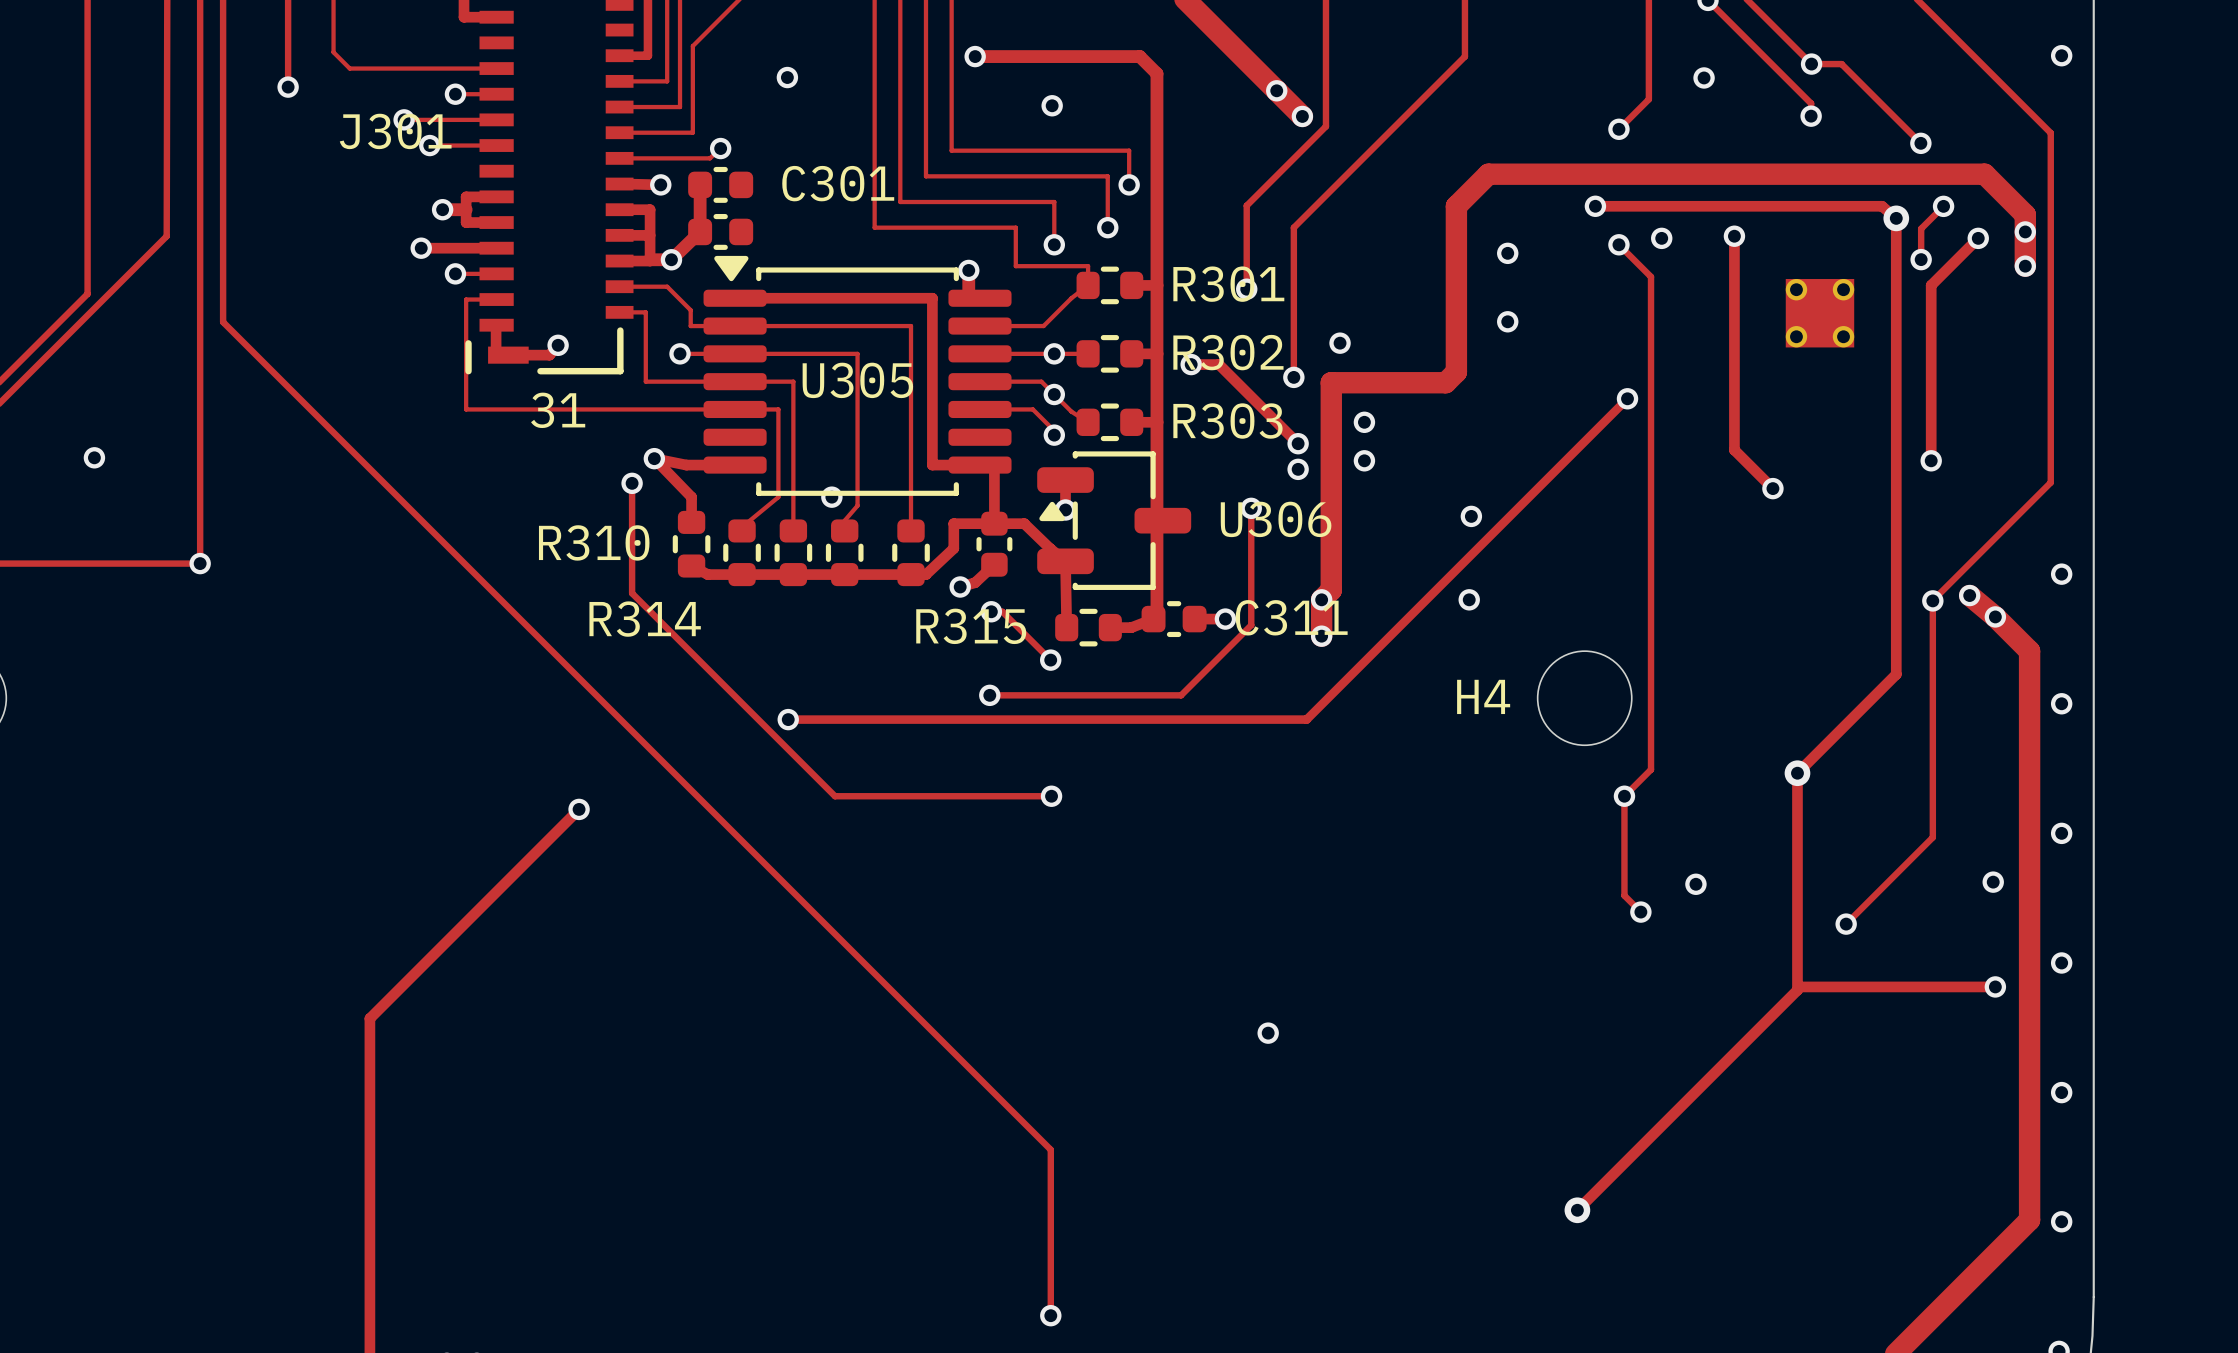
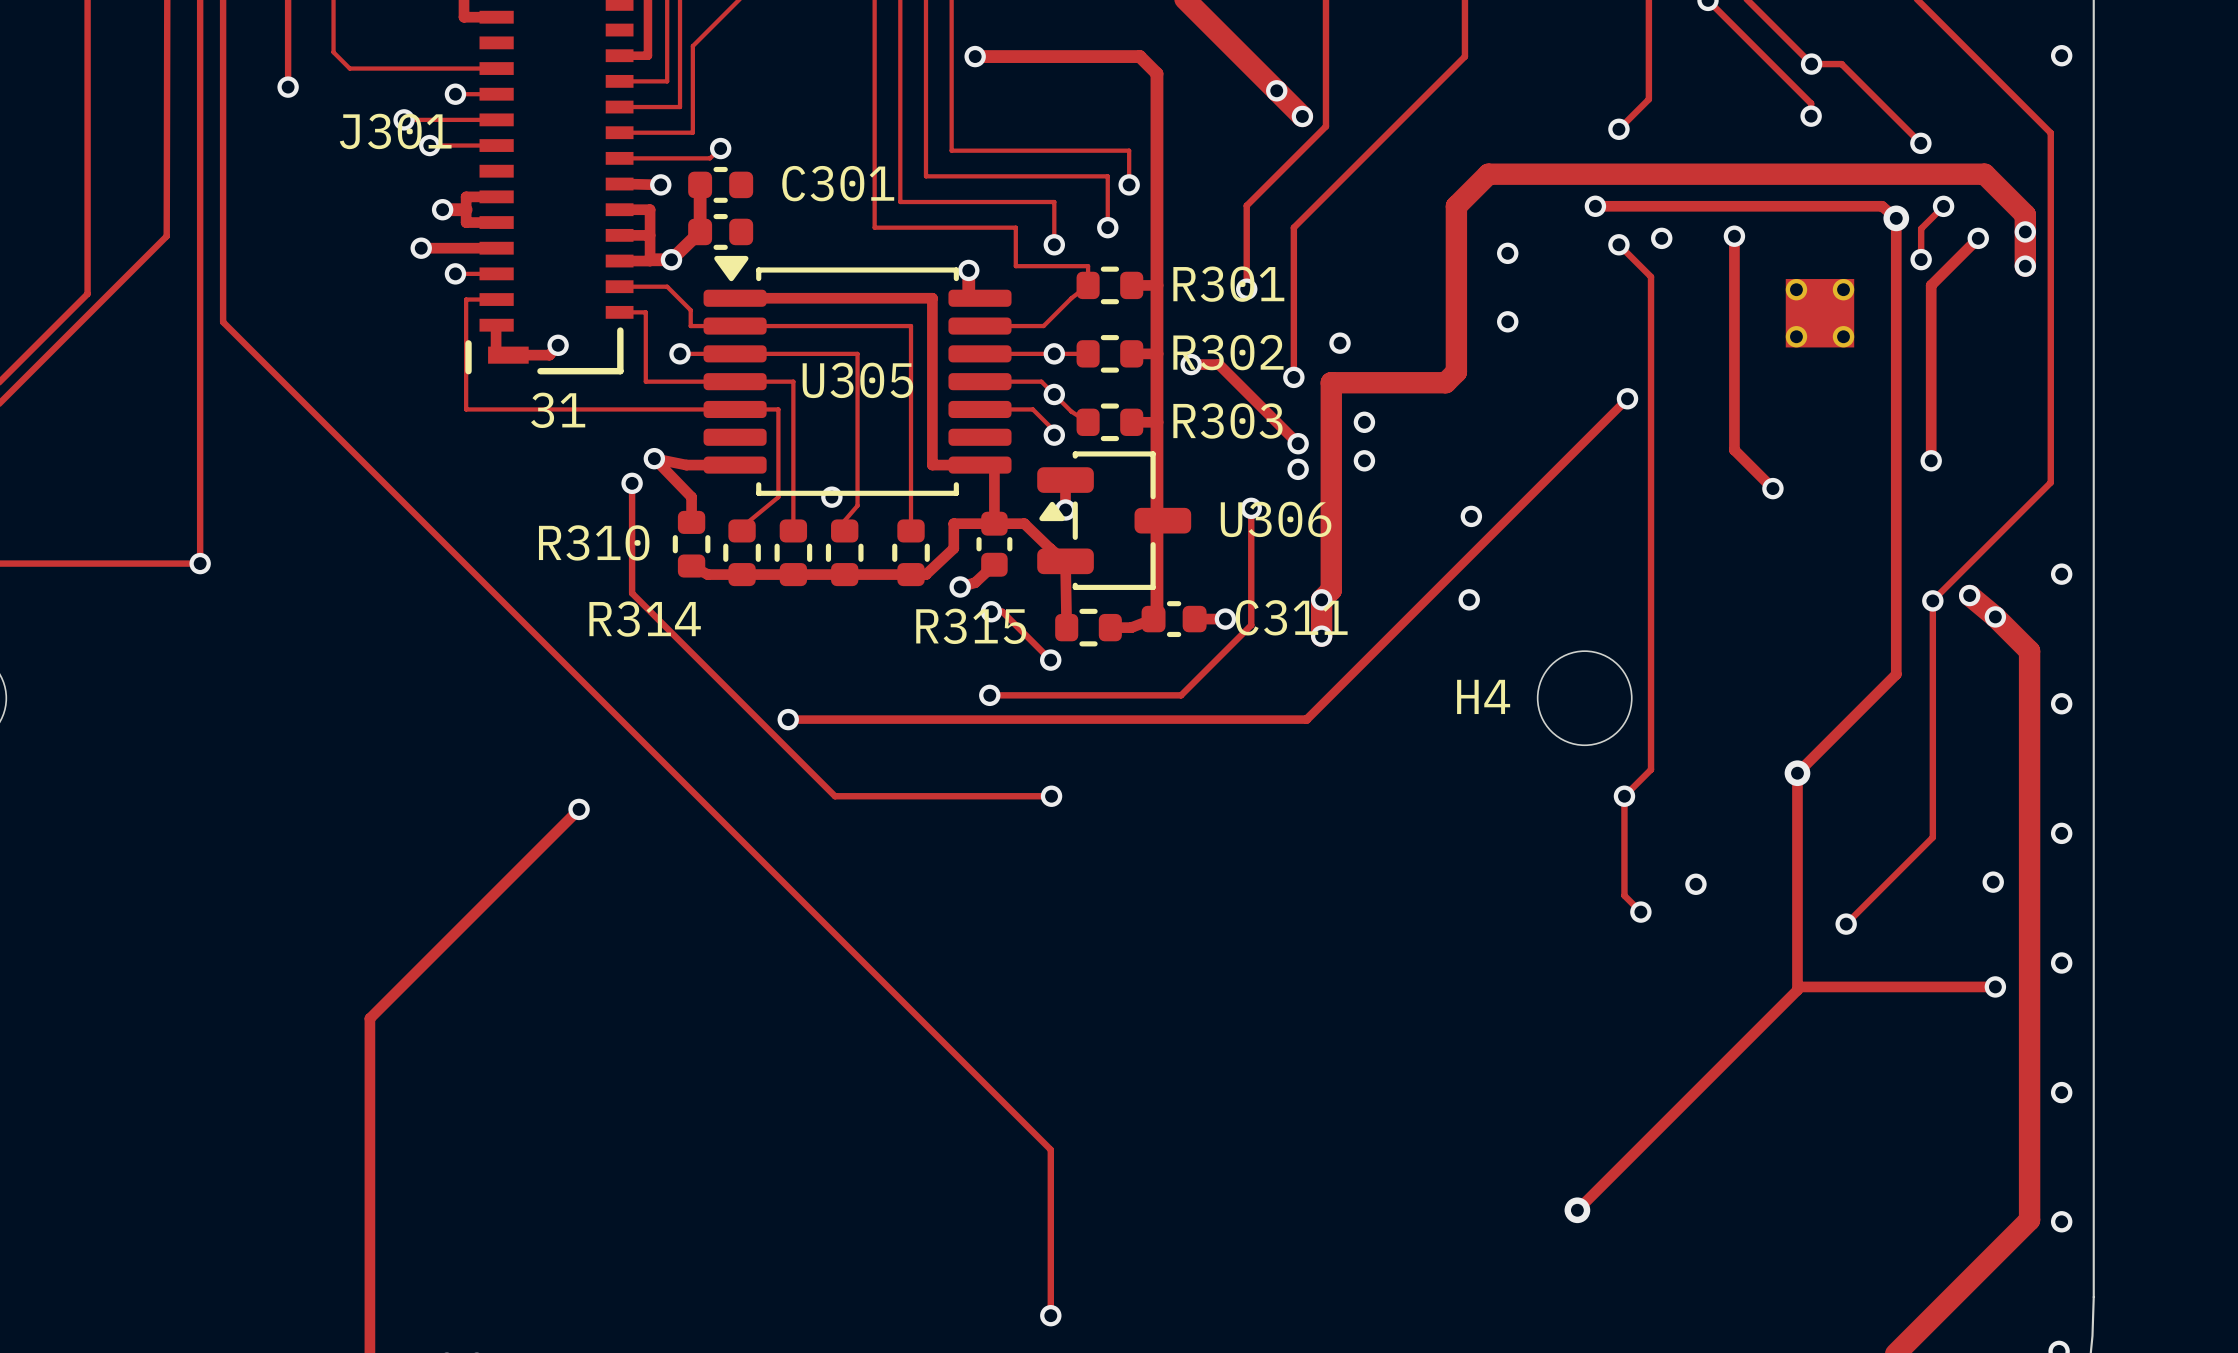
via: (787, 77) -> none
via: (1704, 77) -> none
via: (1052, 105) -> none
via: (94, 457) -> none
via: (1268, 1033) -> none

